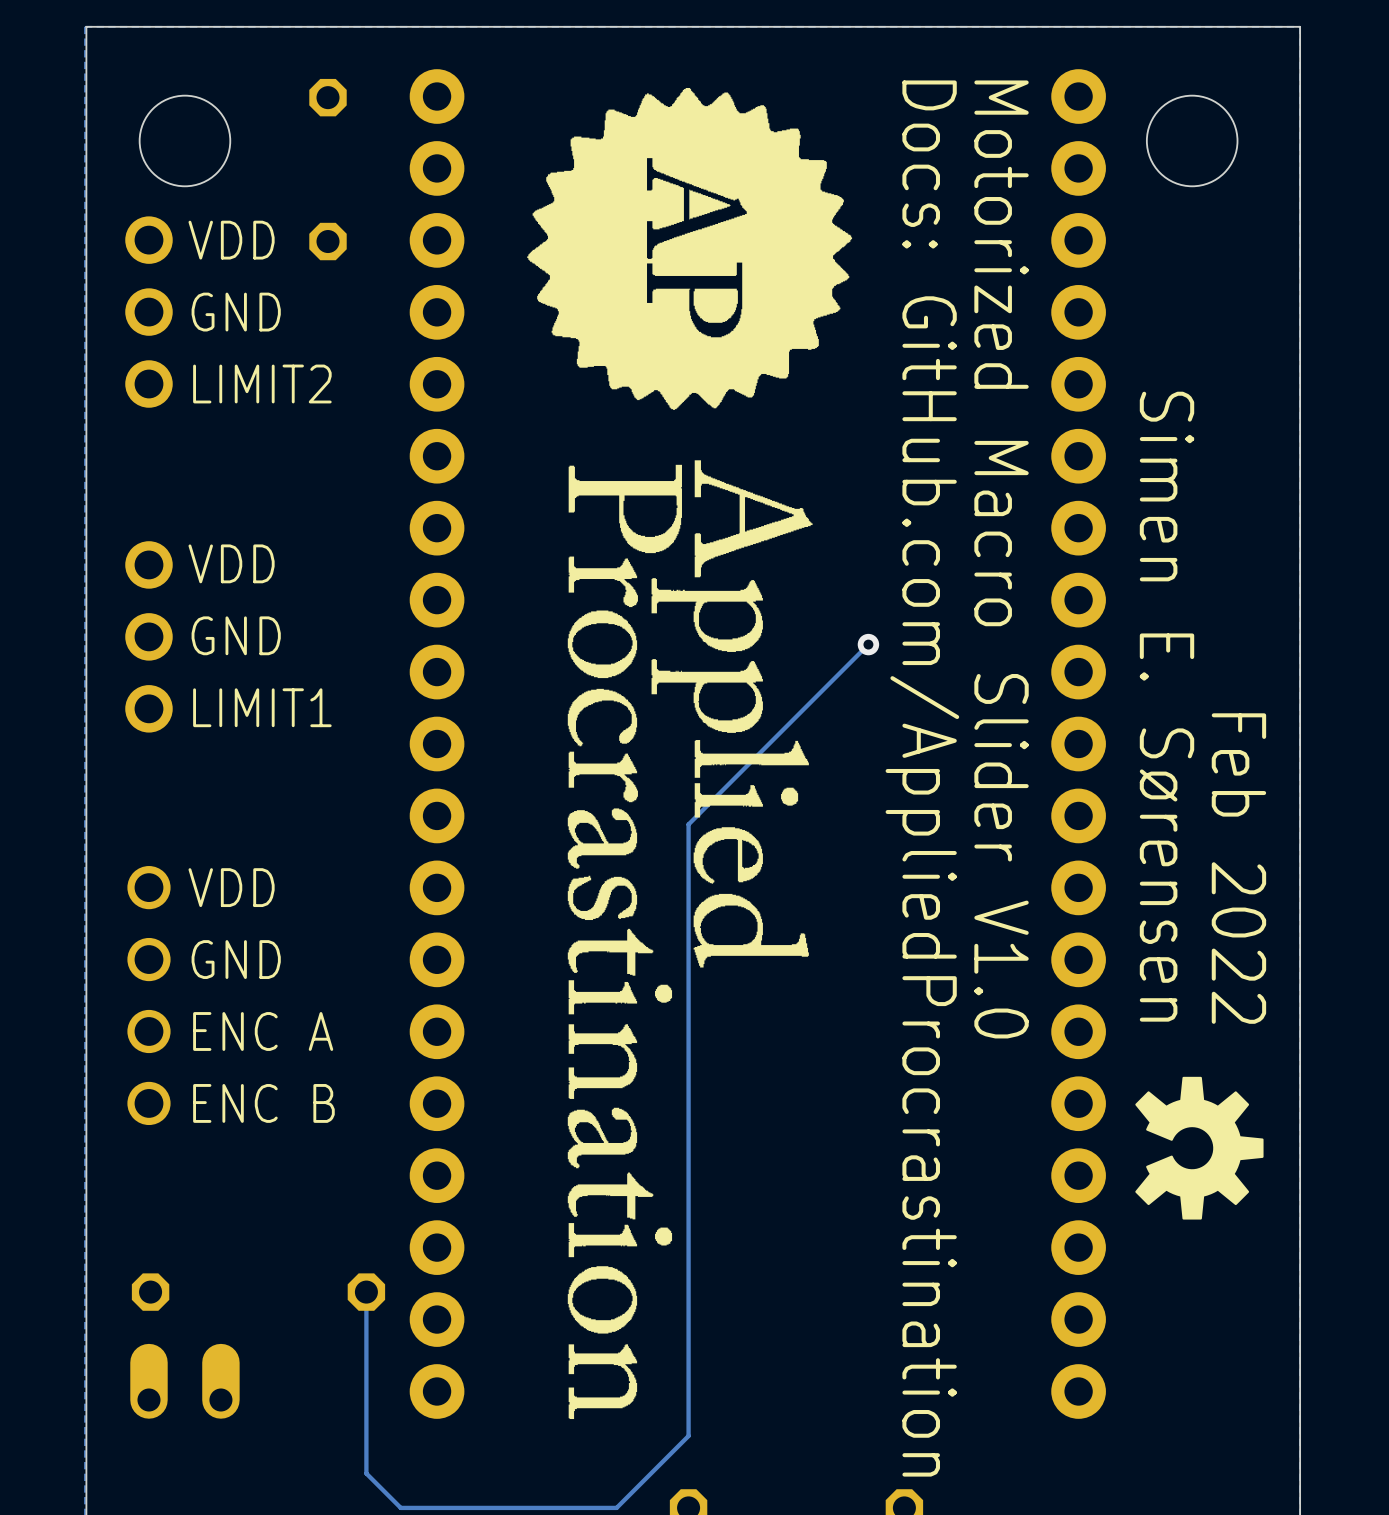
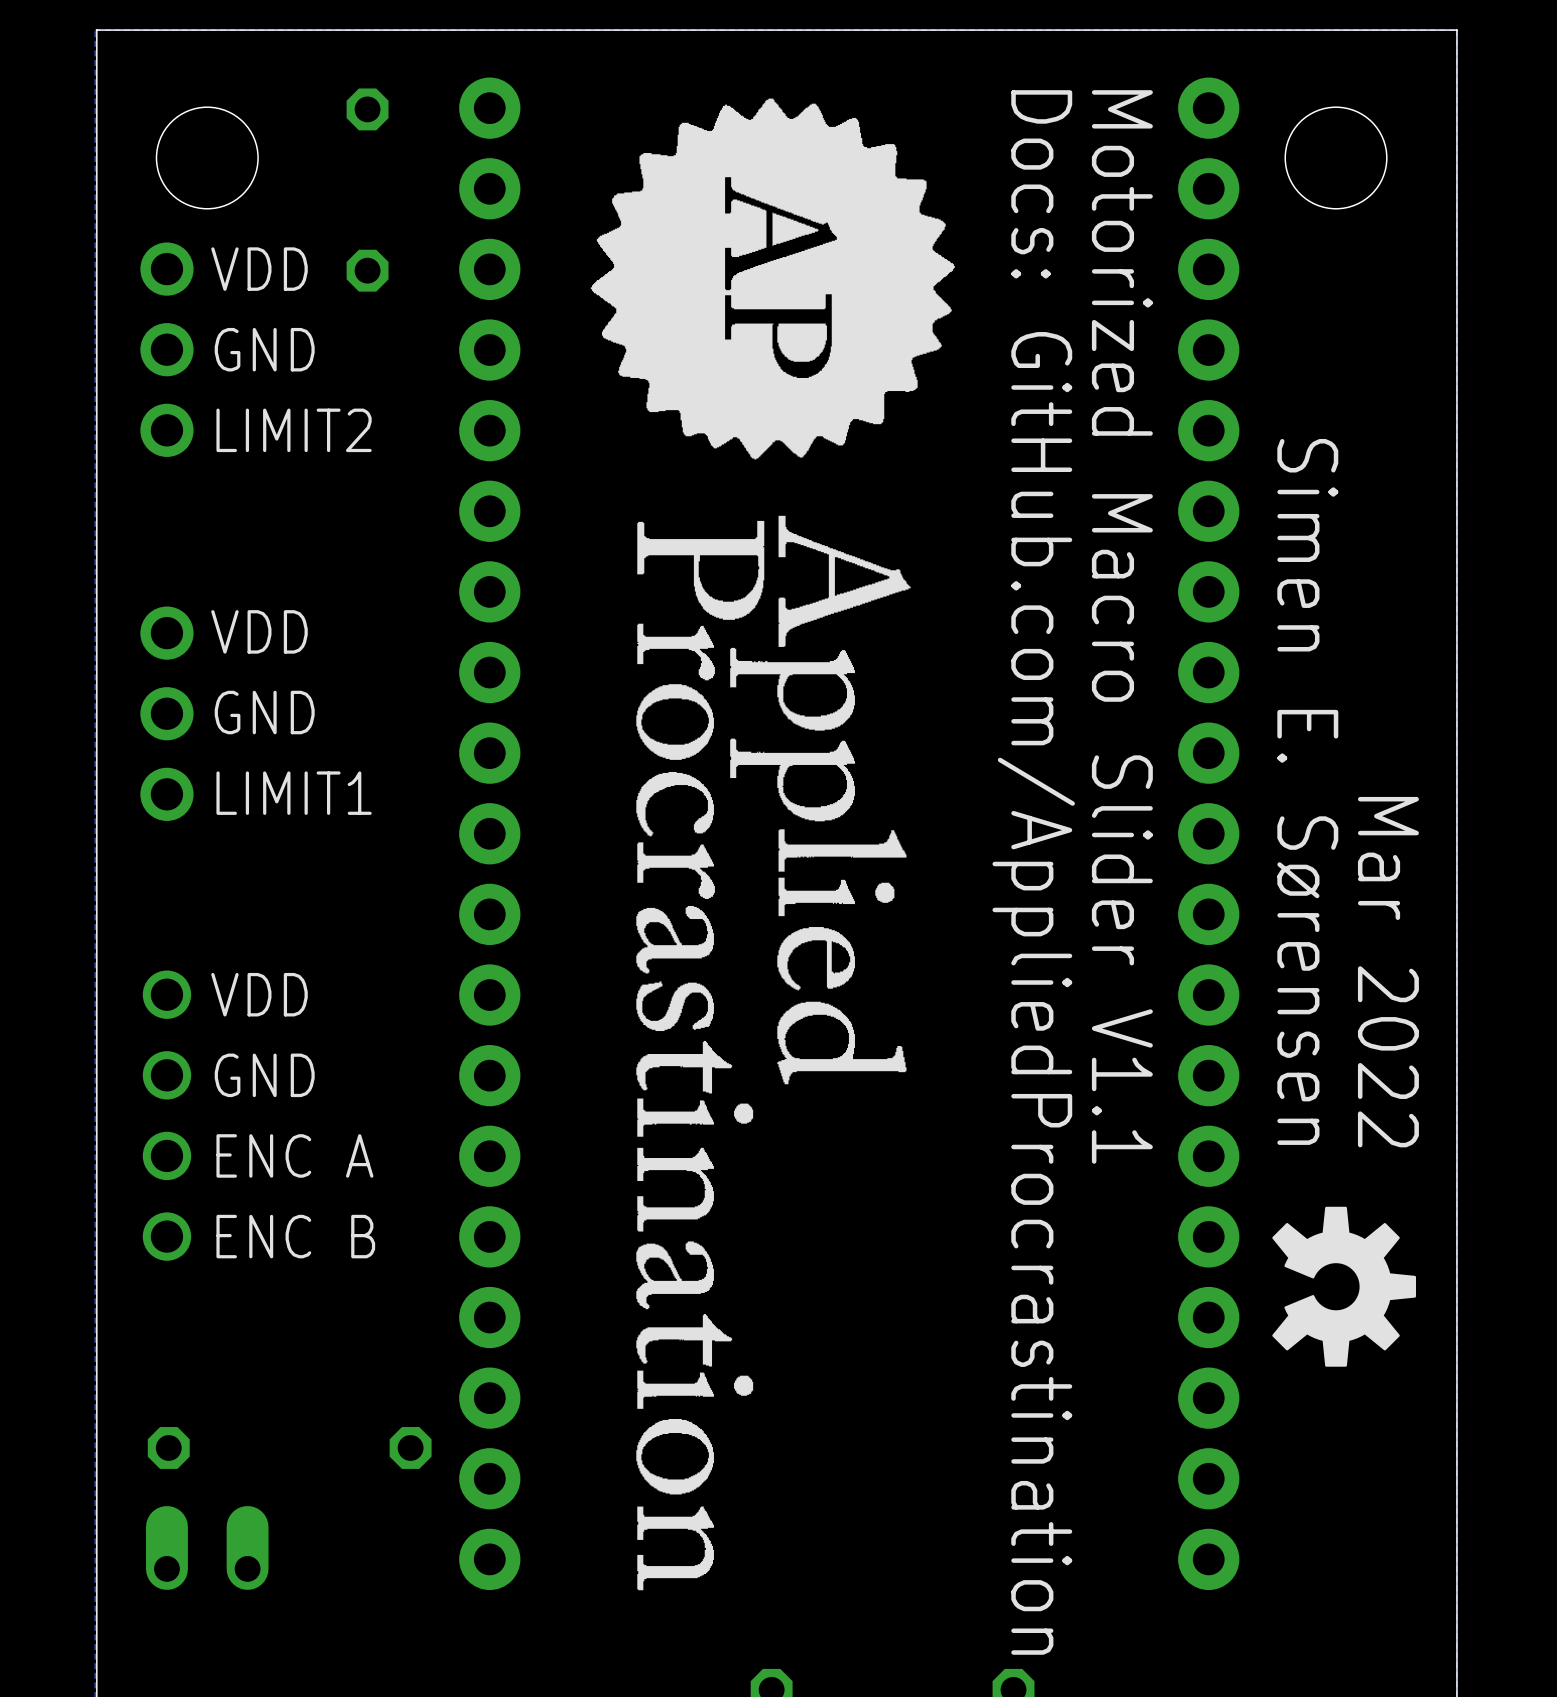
text: Motorized Macro Slider V1.0 (1001, 559) -> Motorized Macro Slider V1.1 (1122, 626)
track: (868, 644) (688, 824) (688, 1435) (616, 1507) (400, 1507) (366, 1473) (366, 1292) -> none
via: (868, 644) -> none
text: Feb 2022 (1238, 868) -> Mar 2022 (1388, 972)

